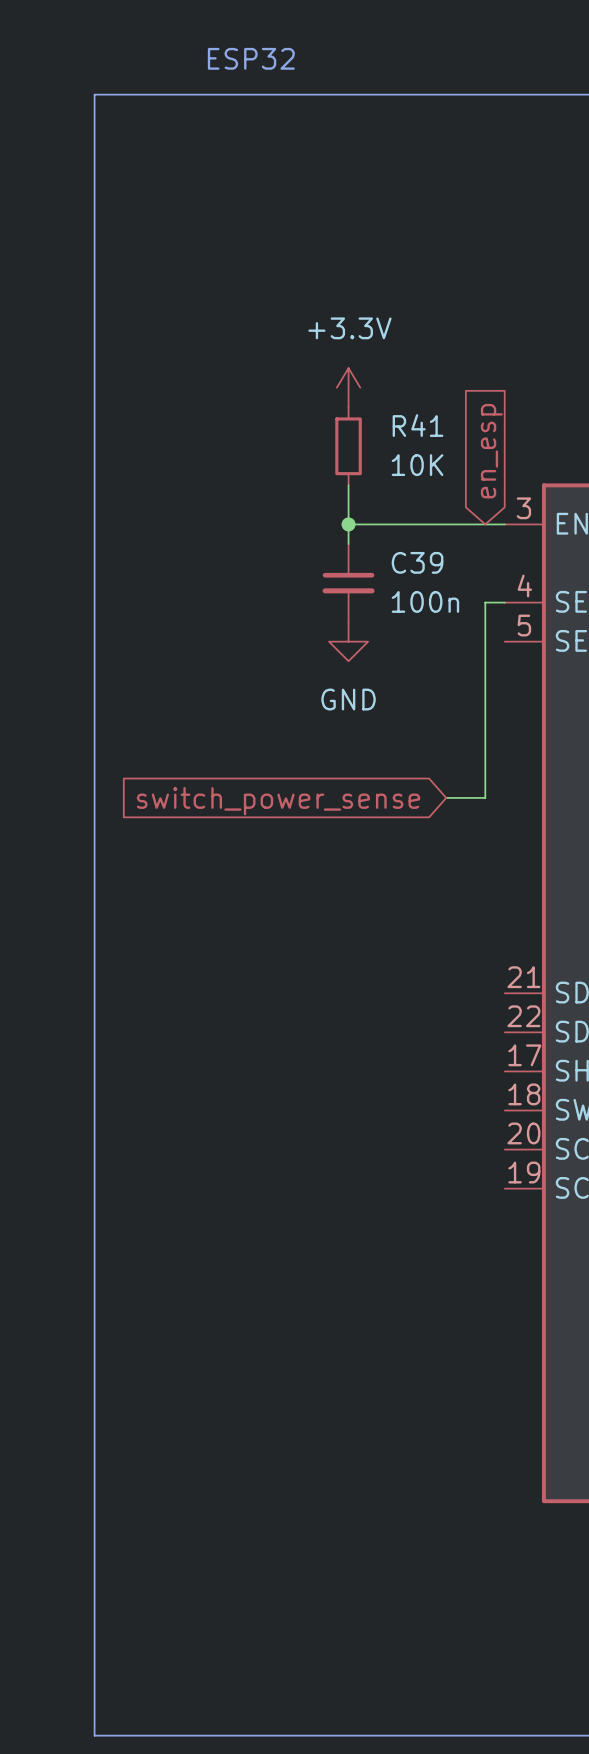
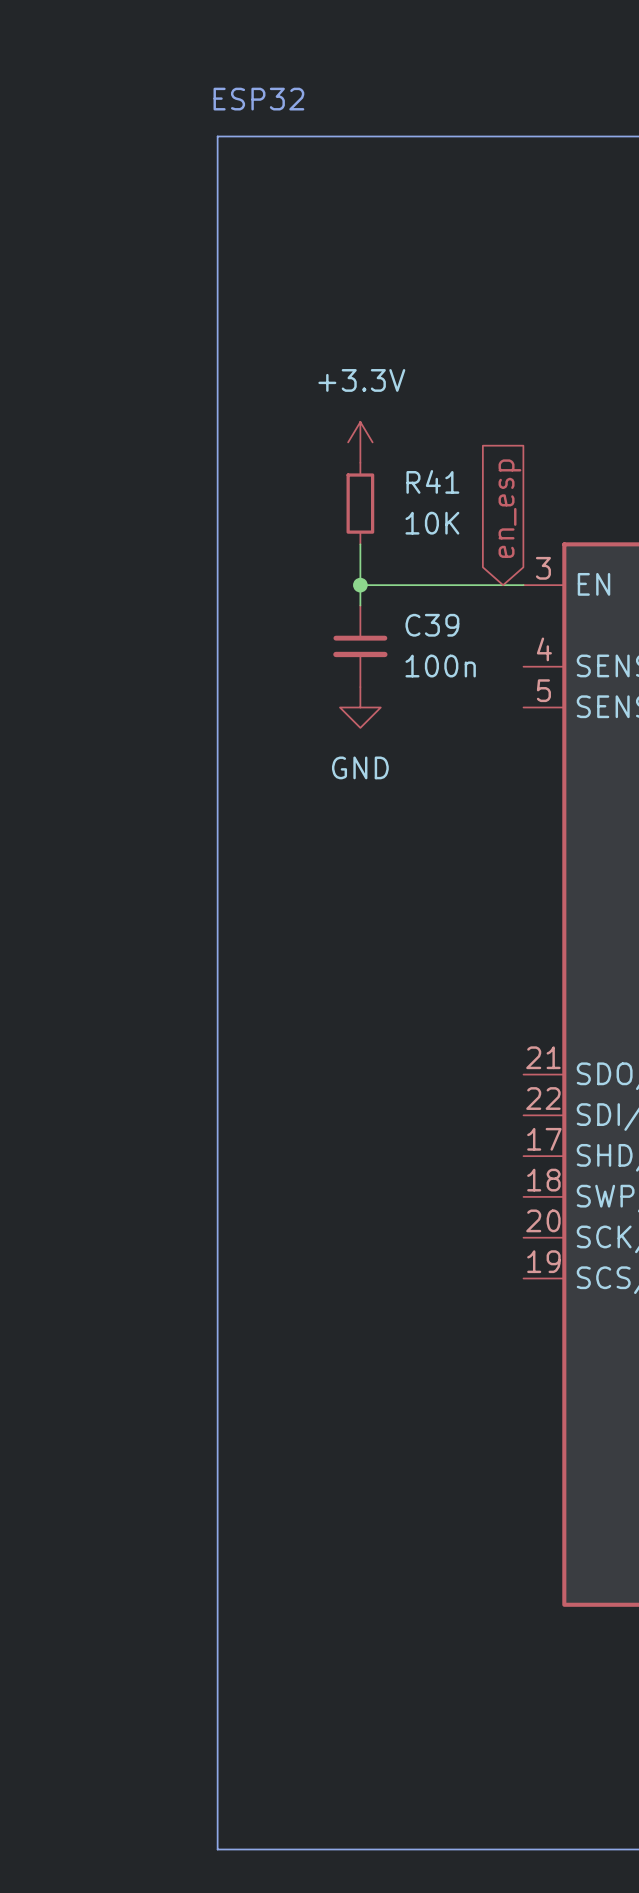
line: (211, 94) (94, 94) (94, 1735) (211, 1735) -> (217, 136) (217, 1849)
wire: (504, 602) (485, 602) (485, 797) (446, 797) -> none
global label: switch_power_sense (278, 801) -> none

